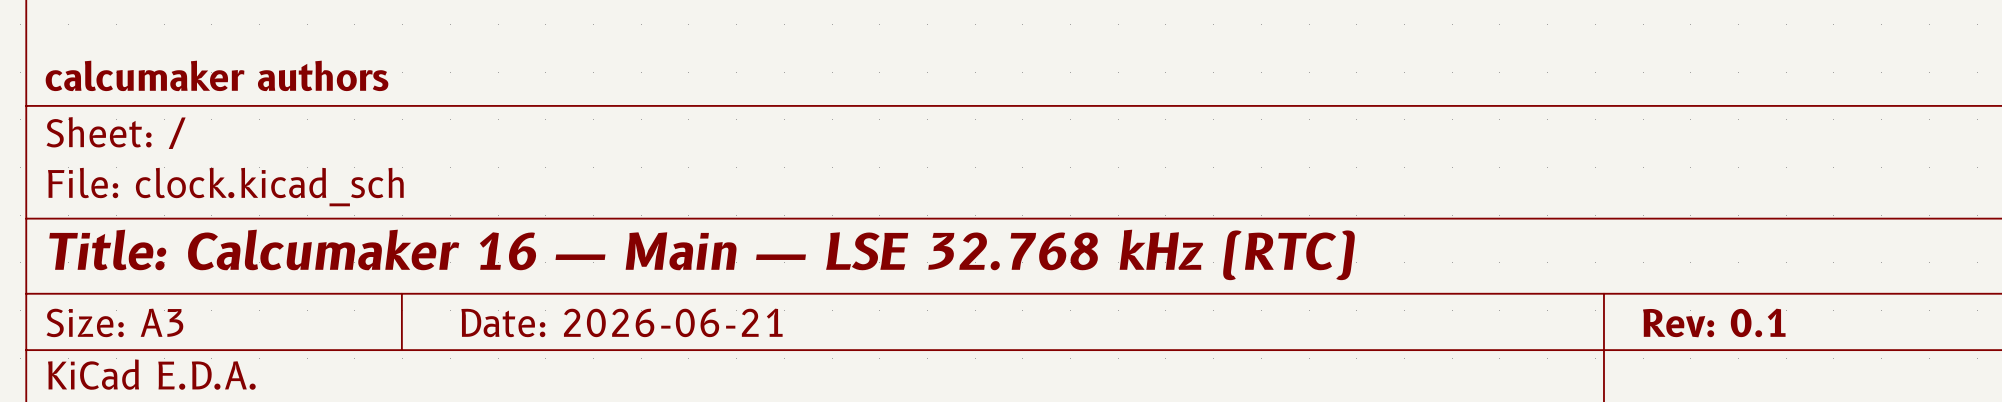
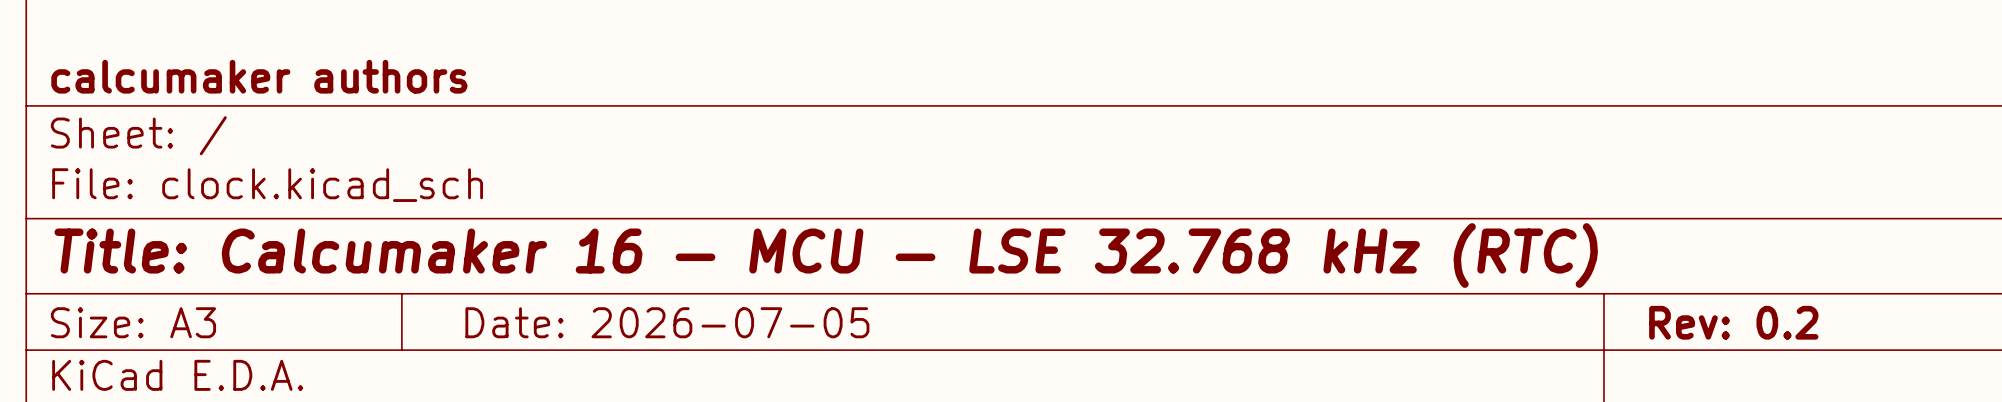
title block: Title: Calcumaker 16 — Main — LSE 32.768 kHz (RTC) (702, 254) -> Title: Calcumaker 16 — MCU — LSE 32.768 kHz (RTC) (826, 255)
title block: Date: 2026-06-21 (622, 322) -> Date: 2026-07-05 (667, 322)
title block: Rev: 0.1 (1714, 323) -> Rev: 0.2 (1733, 322)

